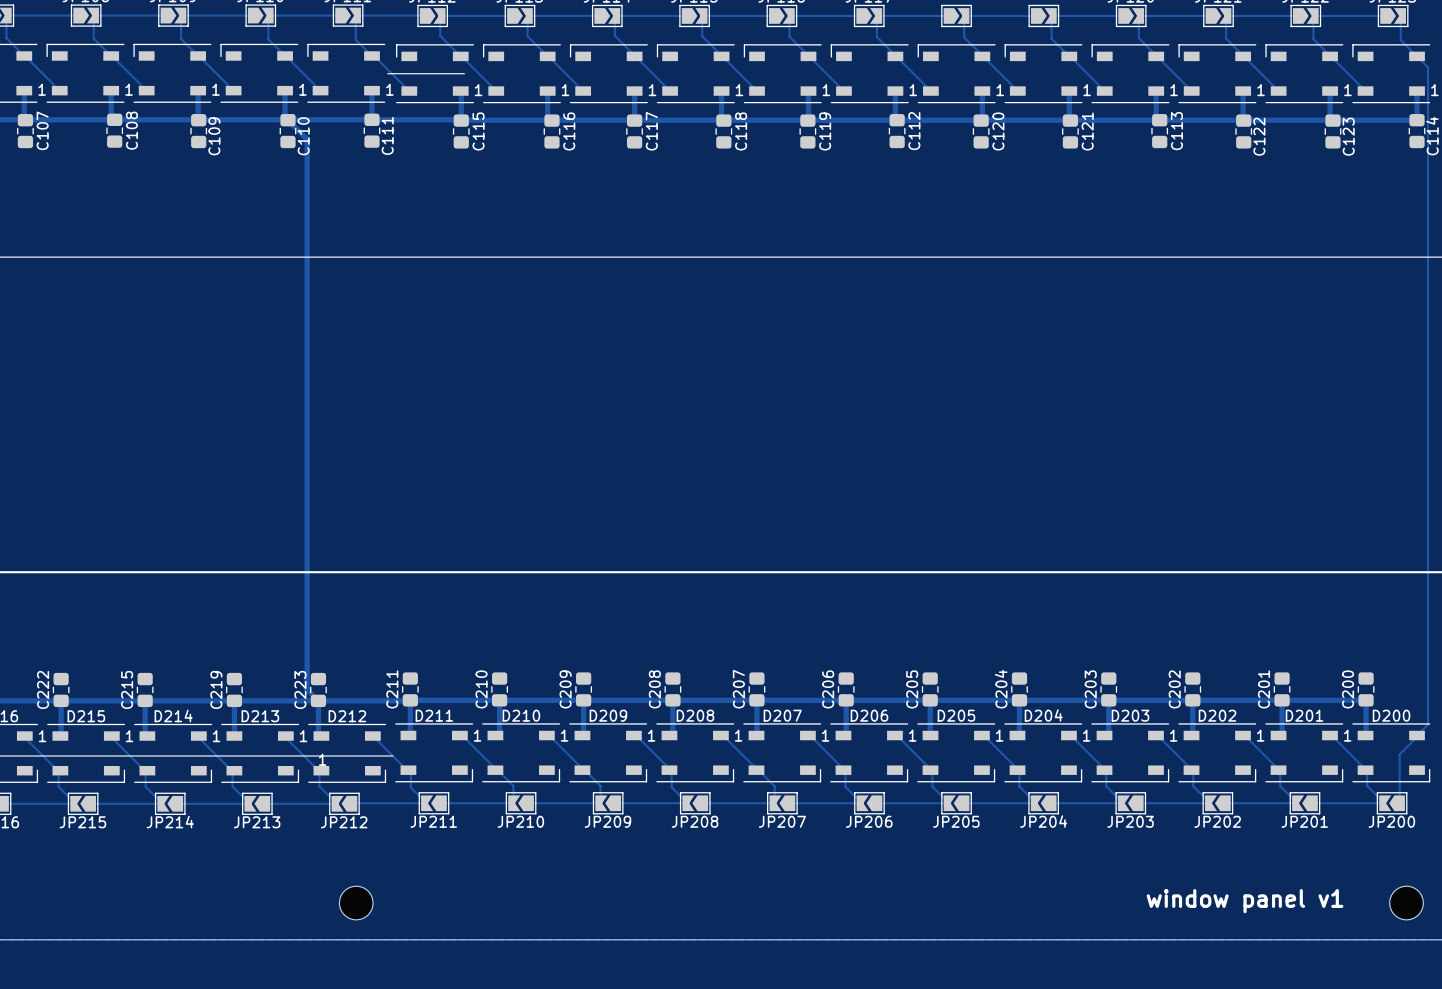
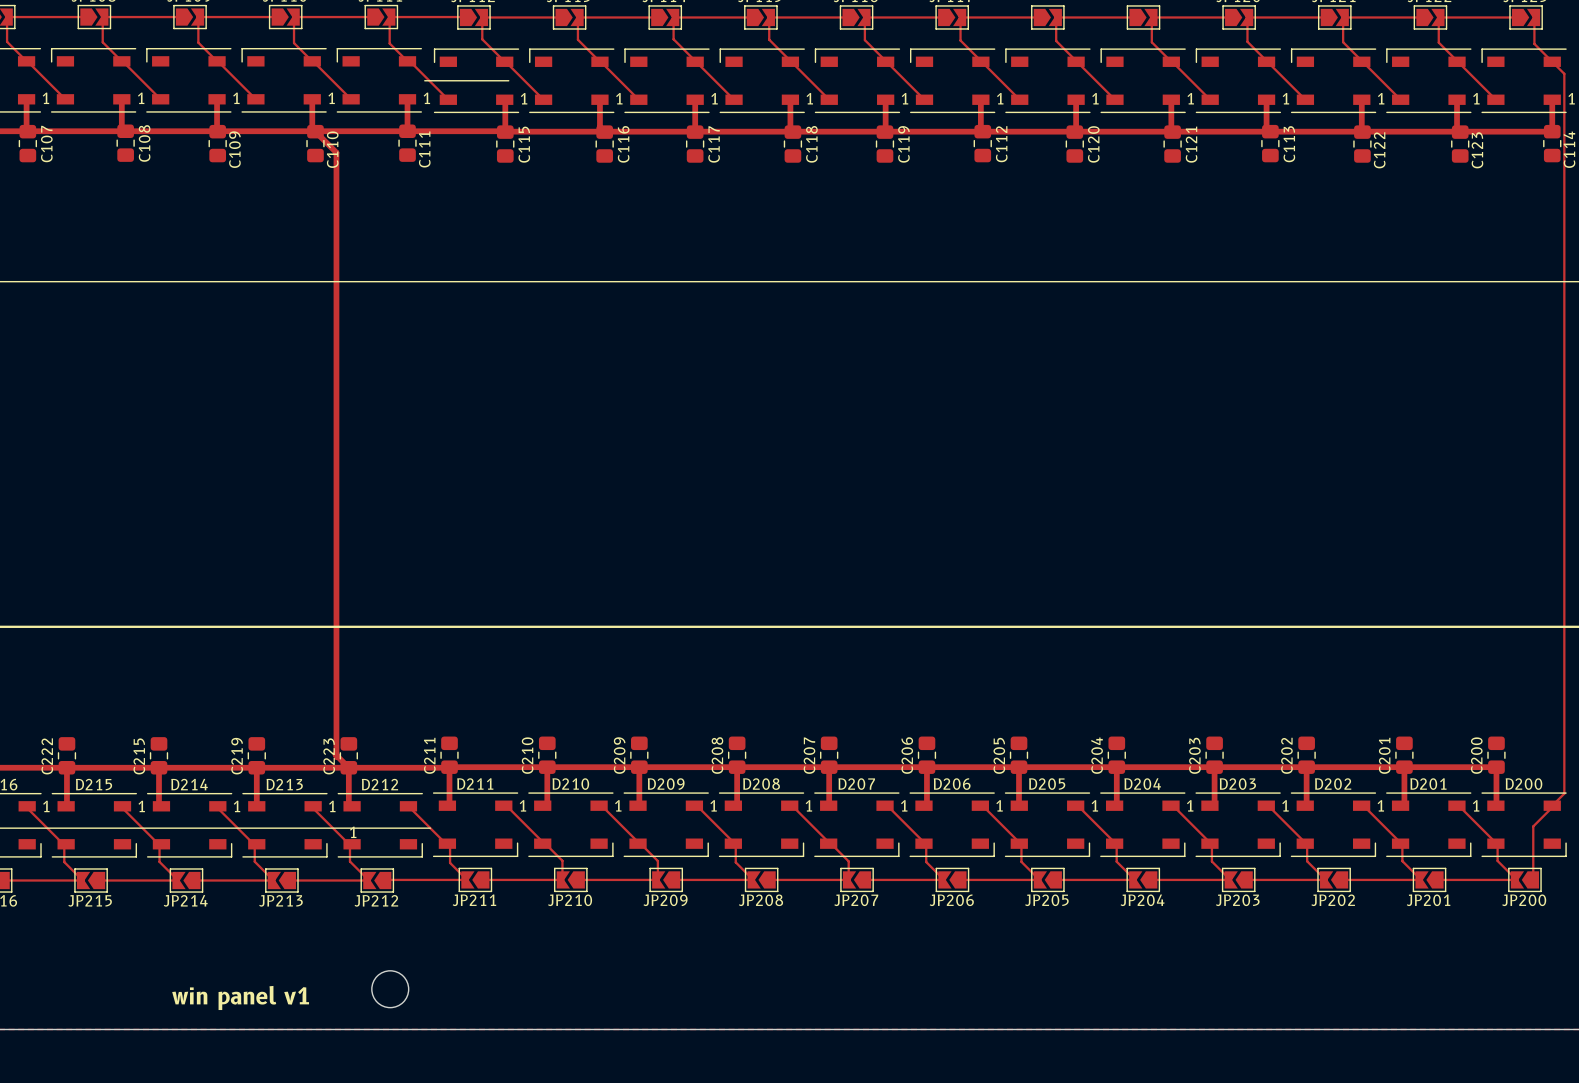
text: window panel v1 (1245, 901) -> none
part: (1406, 903) -> none
text: none -> win panel v1 (240, 997)

